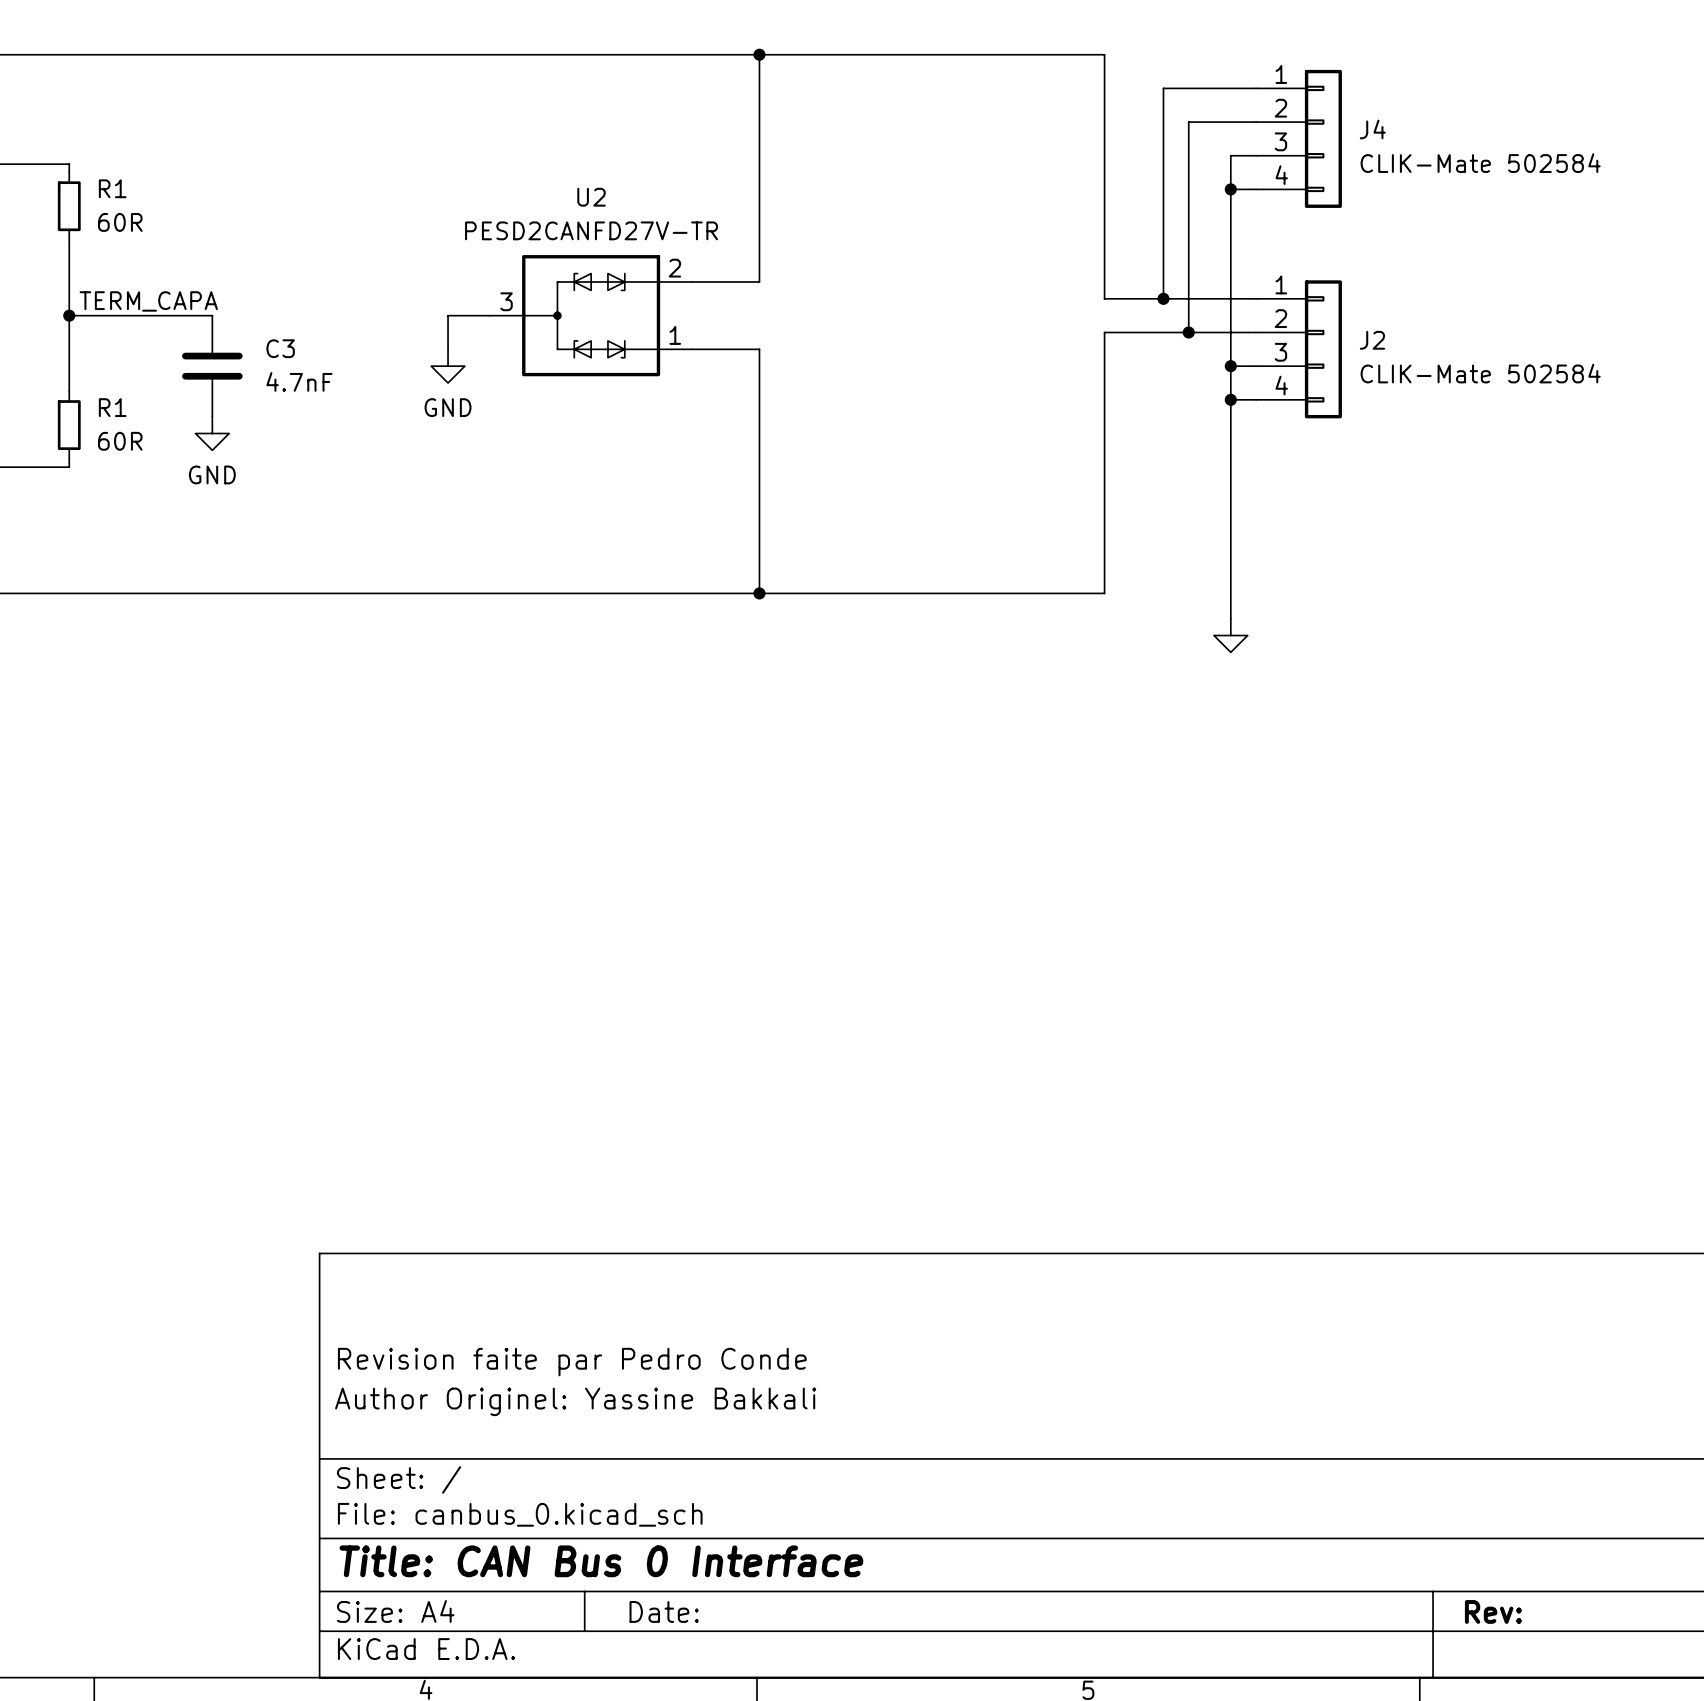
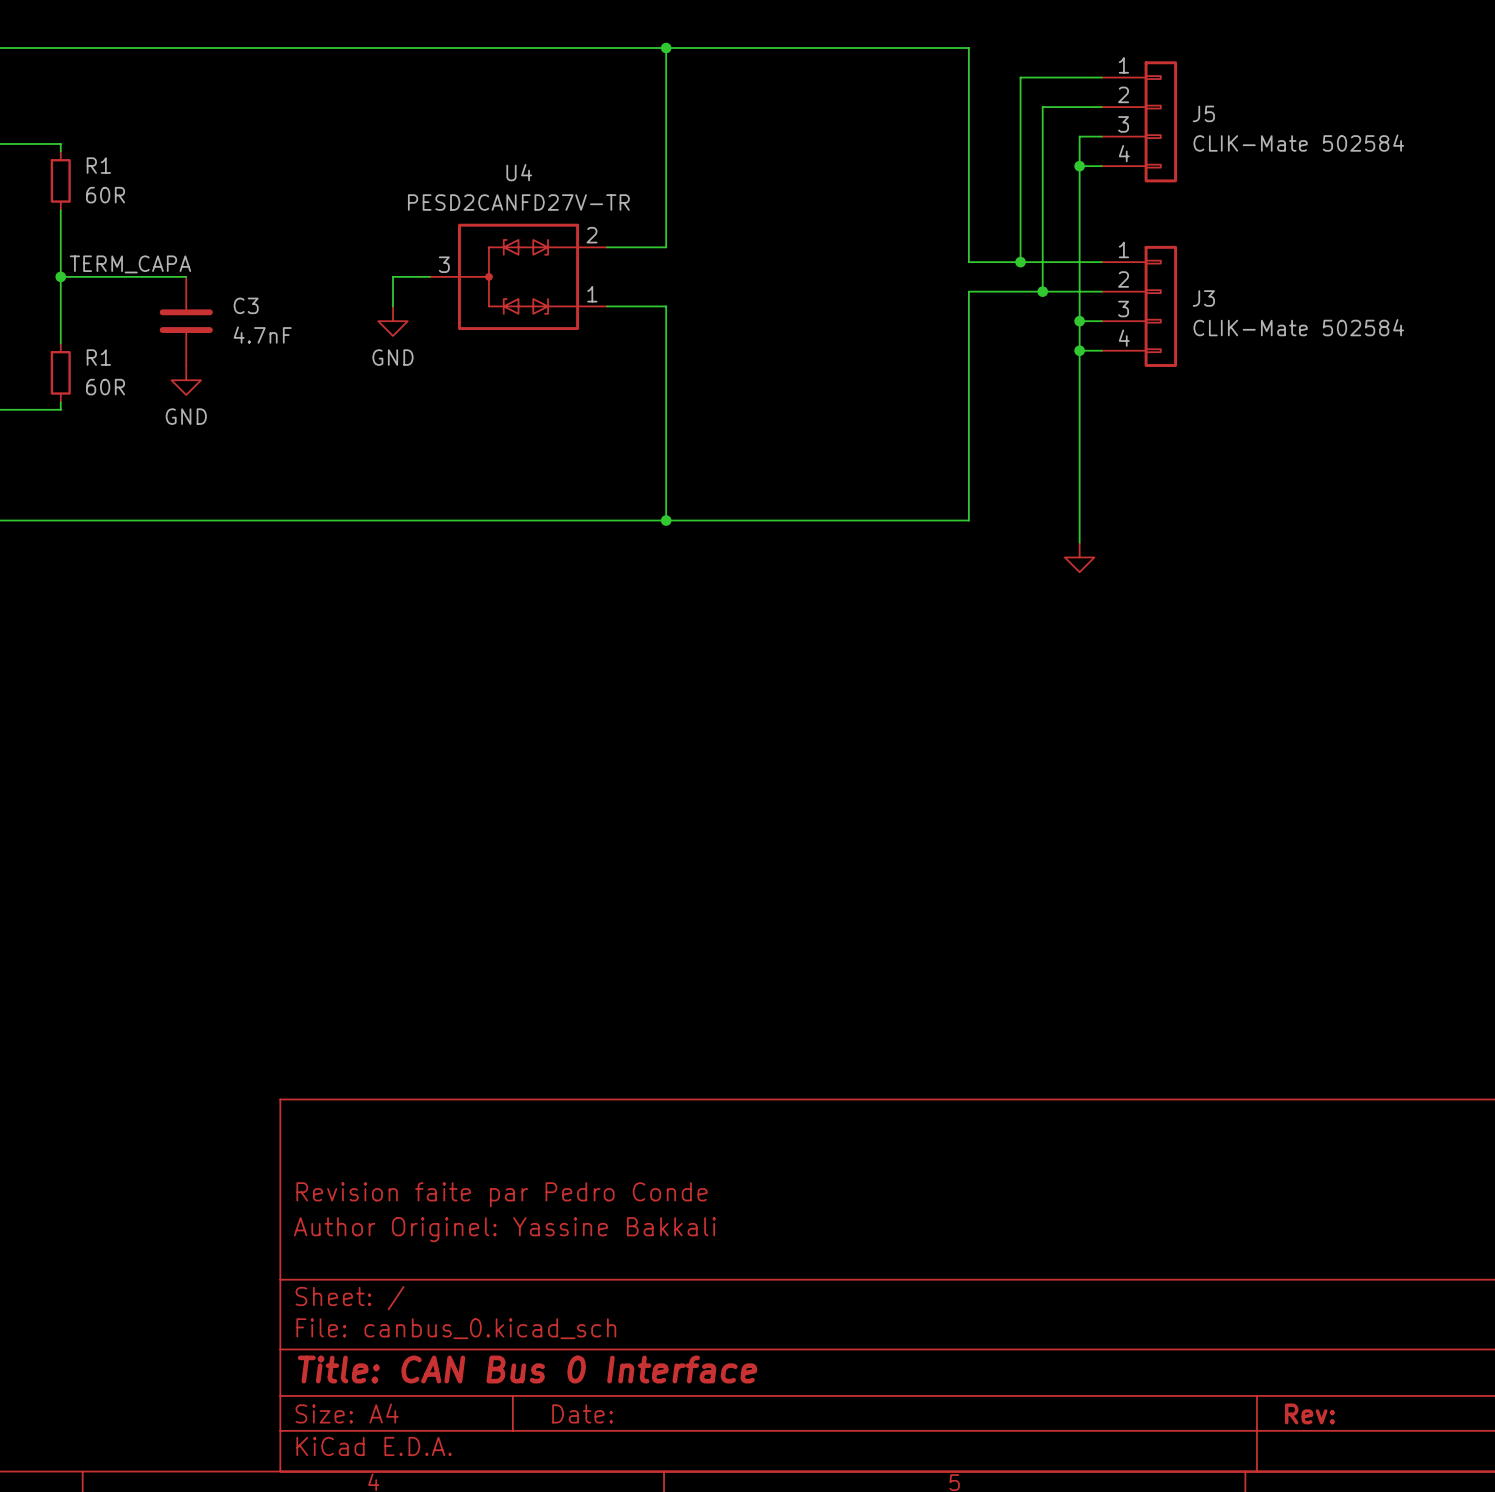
J4 name: J4 (1372, 129) -> J5 (1203, 113)
U2 name: U2 (591, 197) -> U4 (519, 172)
J2 name: J2 (1372, 340) -> J3 (1203, 298)

